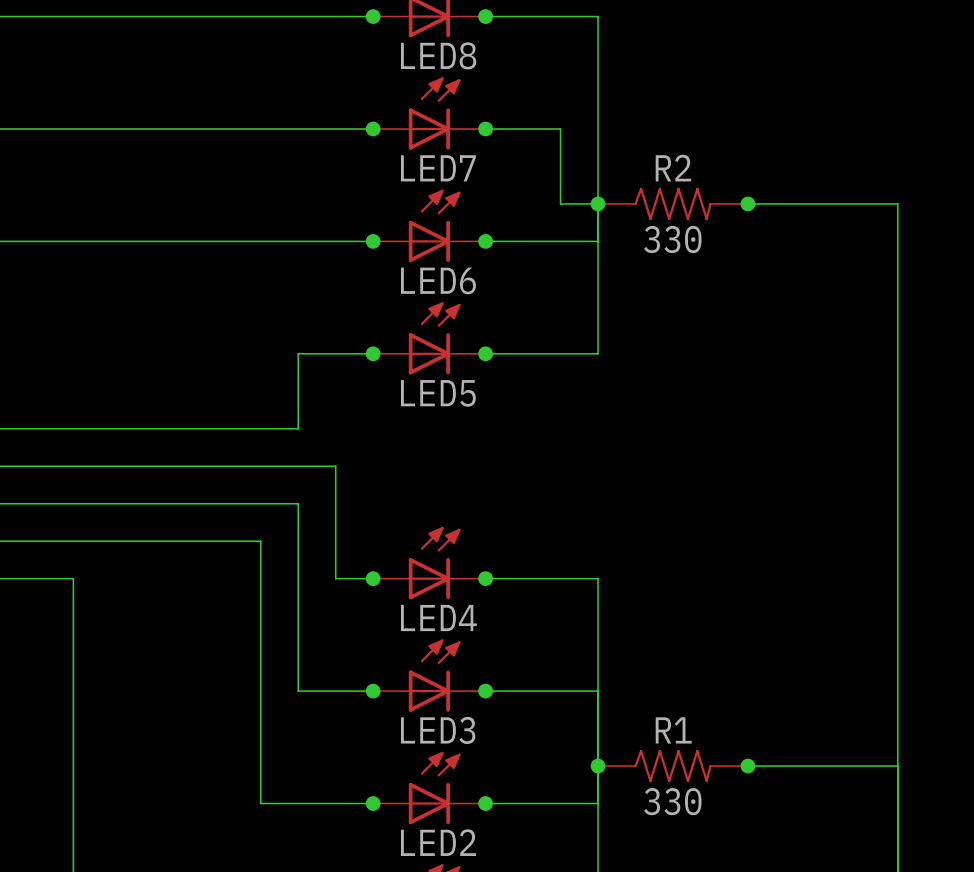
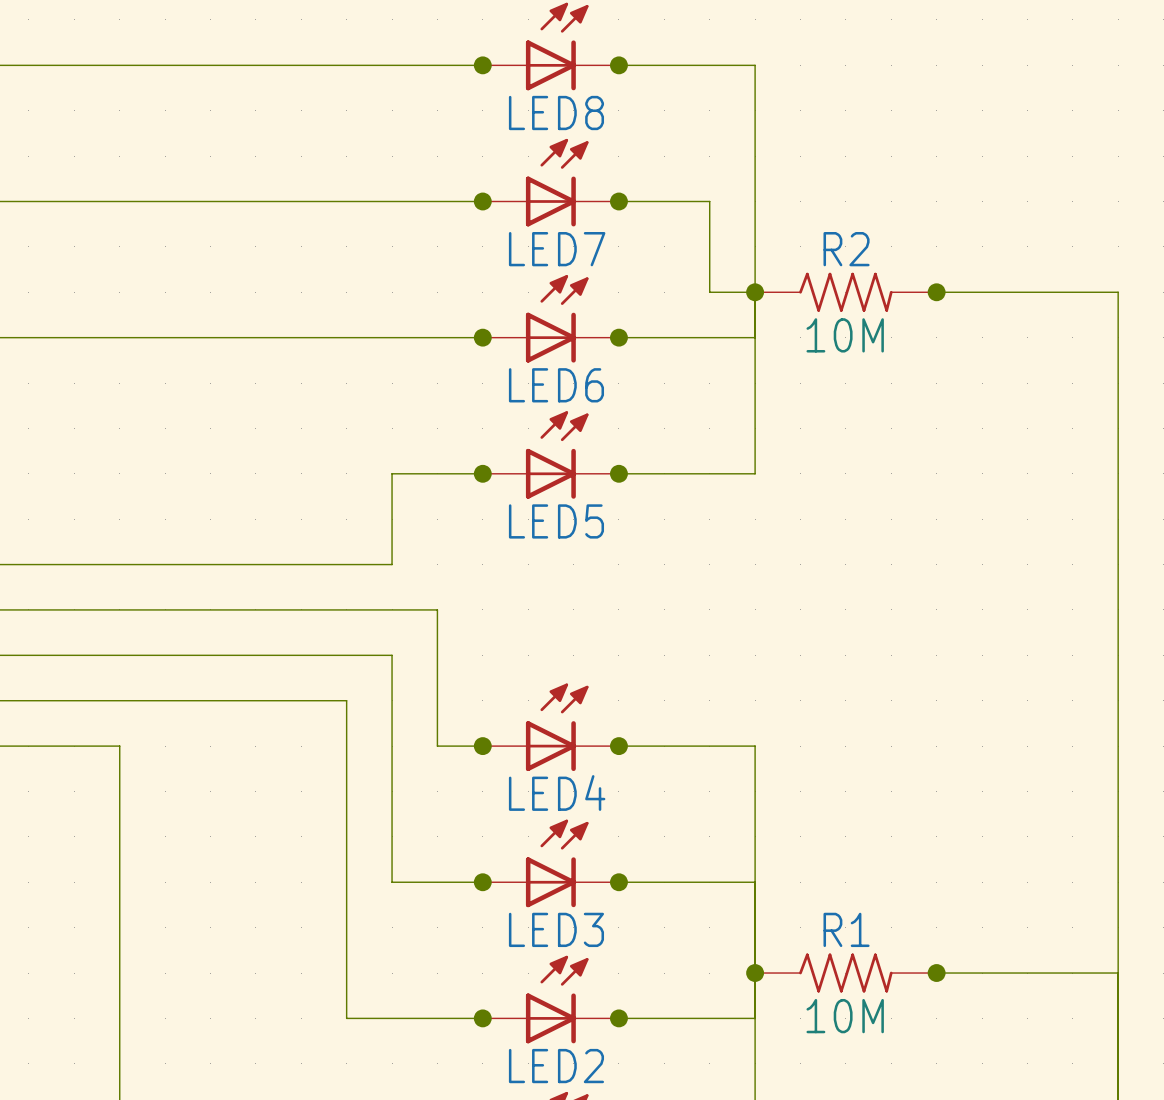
R2 value: 330 (672, 239) -> 10M (845, 335)
R1 value: 330 (672, 801) -> 10M (845, 1016)

